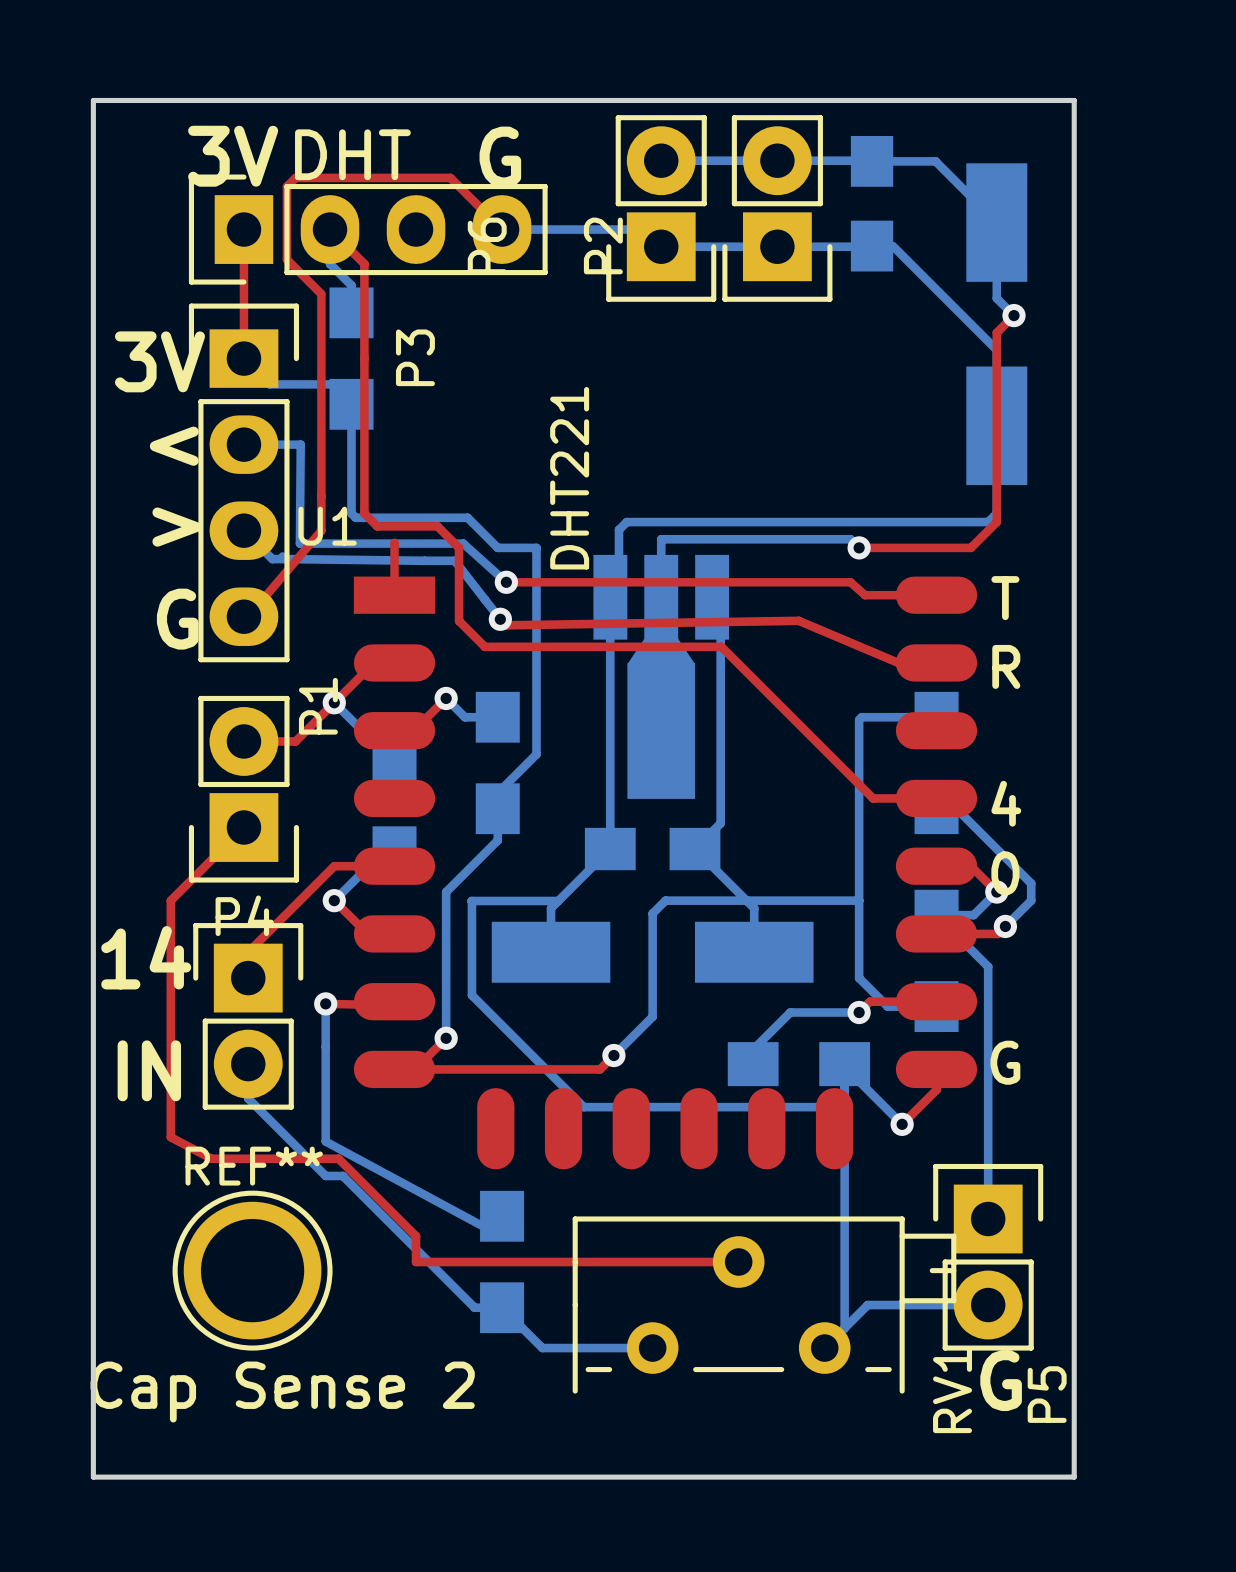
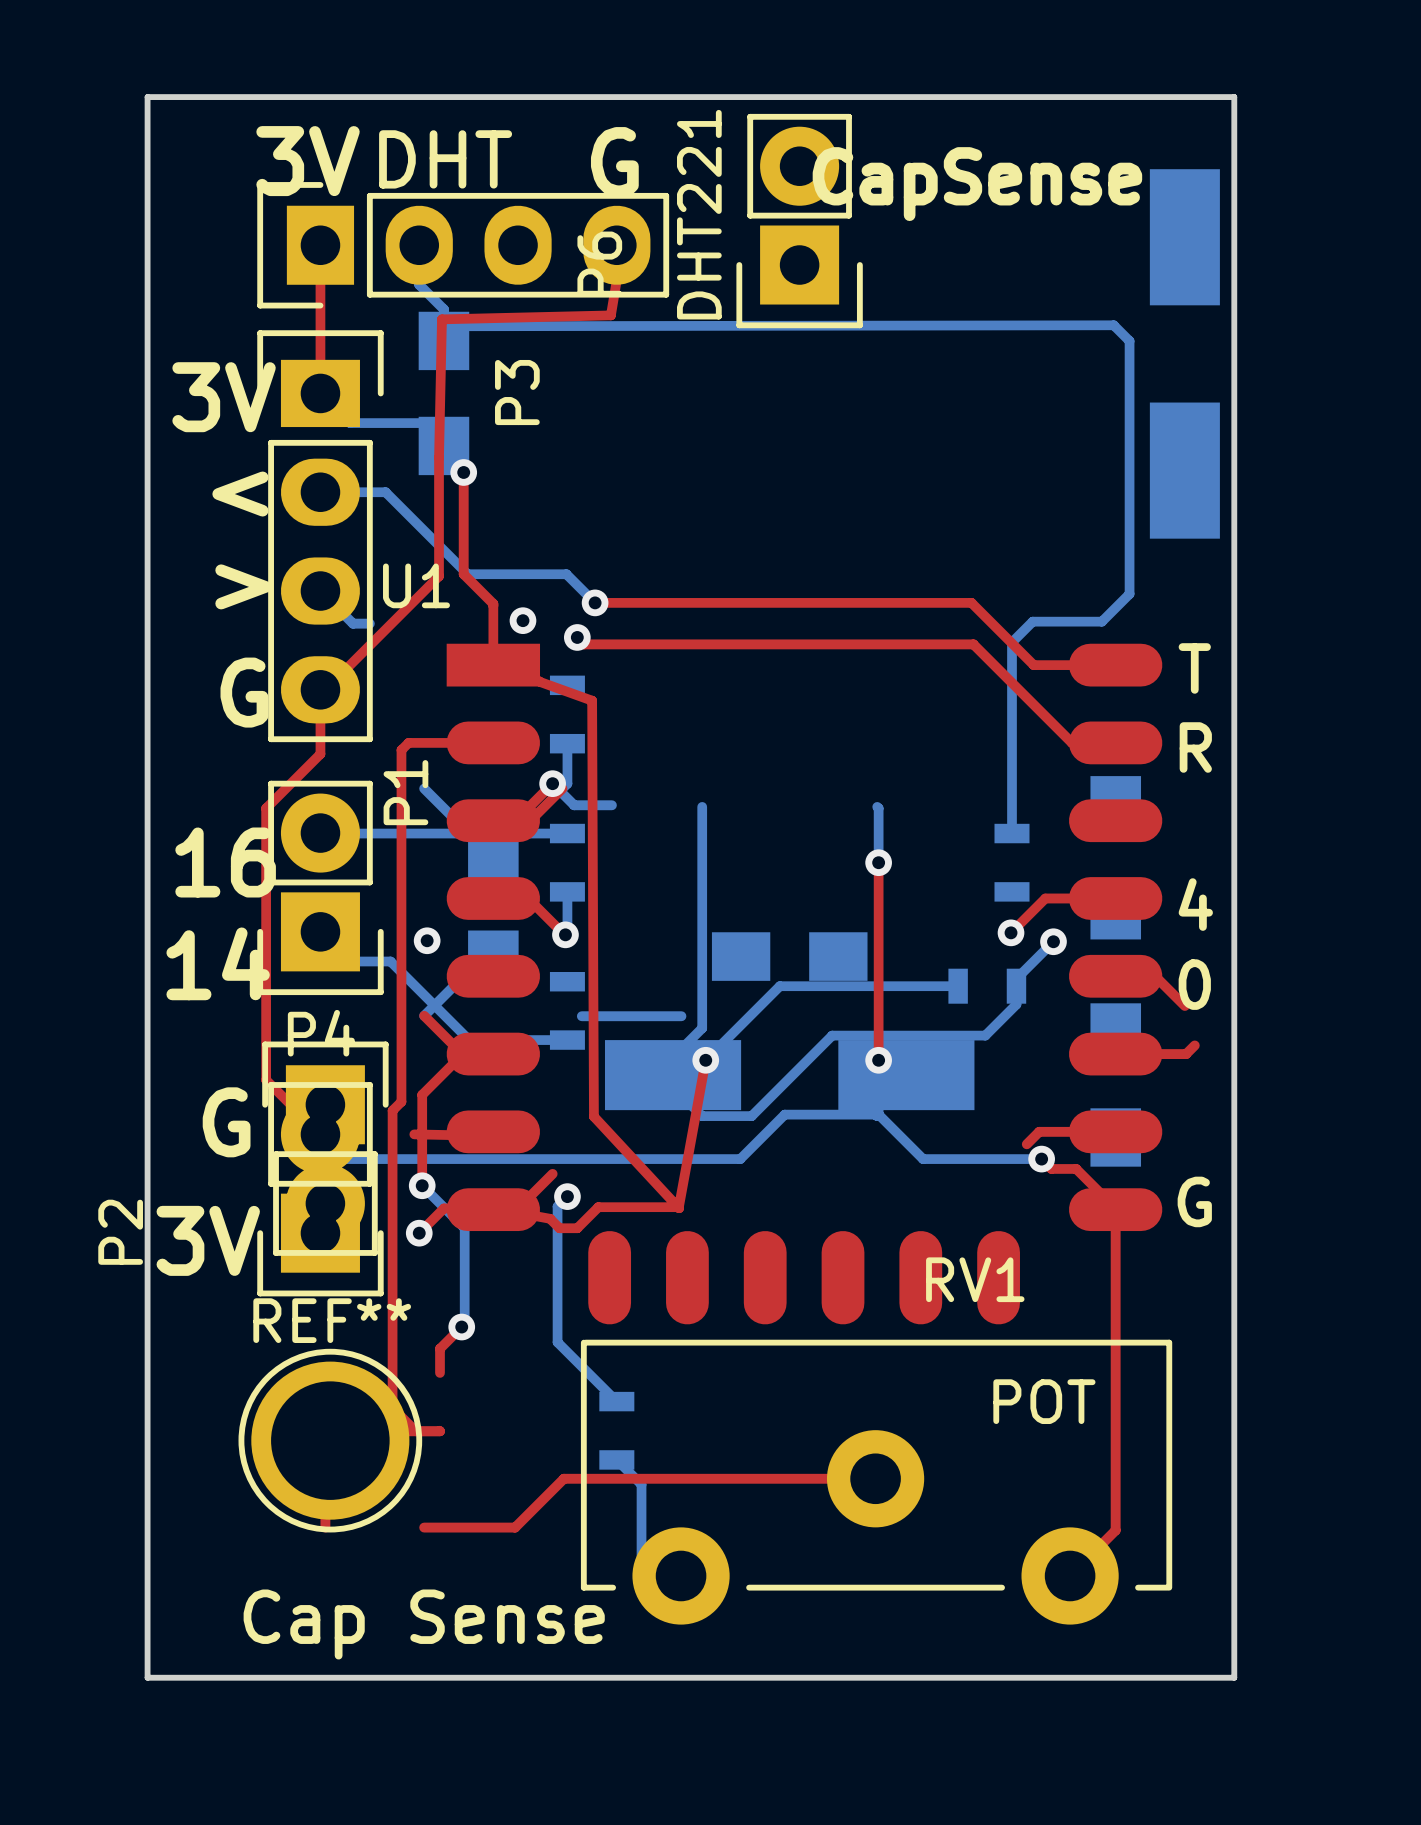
board edge: (1039, 100) (1074, 100) (1074, 1477) (1039, 1477) -> (1234, 97) (1234, 1677)
bottom track: (661, 160) (935, 161) (996, 222) (996, 298) (1014, 315) -> none
text: none -> CapSense (977, 184)
part: (872, 203) -> none
P2 position: (777, 208) -> (320, 1189)
top track: (329, 229) (364, 263) (364, 513) (377, 526) (437, 526) (459, 547) (459, 621) (484, 646) (721, 646) (873, 798) (875, 798) -> (1011, 932) (1045, 898)
bottom track: (502, 229) (644, 229) (661, 246) (872, 246) -> none
top track: (502, 229) (450, 177) (295, 177) (286, 186) (286, 259) (321, 294) (321, 530) (248, 616) -> (616, 245) (616, 279) (610, 315) (441, 319) (439, 576) (325, 689)
bottom track: (892, 246) (996, 349) (996, 513) (988, 522) (626, 522) (619, 529) (619, 580) (610, 588) (610, 849) (551, 908) (551, 952) -> none
bottom track: none -> (442, 326) (1113, 325) (1129, 341) (1129, 593) (1101, 621) (1032, 621) (1012, 642) (1012, 833)
top track: (1014, 315) (996, 332) (996, 522) (970, 547) (859, 547) -> none
via: (1014, 315) -> none
bottom track: (351, 404) (351, 513) (355, 517) (467, 517) (497, 547) (536, 547) (536, 754) (497, 793) (497, 840) (446, 892) (446, 1038) -> none
top track: none -> (463, 472) (463, 574) (493, 605)
via: none -> (463, 472)
bottom track: (300, 444) (299, 543) (463, 543) (506, 582) -> (385, 492) (467, 574) (566, 574) (595, 602)
DHT221 name position: DHT221 (569, 478) -> DHT221 (699, 214)
via: none -> (595, 602)
bottom track: (859, 547) (850, 539) (661, 539) (661, 597) -> none
via: (859, 547) -> none
bottom track: (282, 556) (285, 559) (454, 560) (500, 619) -> none
via: none -> (522, 620)
via: none -> (577, 637)
bottom track: (720, 580) (720, 823) (694, 849) (754, 908) (754, 952) -> none
top track: (506, 582) (850, 582) (865, 595) -> (595, 602) (971, 602) (1033, 665)
via: (506, 582) -> none
top track: none -> (513, 665) (540, 682) (592, 700) (593, 1116) (678, 1207)
top track: none -> (320, 689) (320, 754) (266, 808) (266, 1080) (320, 1134)
top track: (500, 619) (506, 625) (798, 620) (898, 662) -> (577, 637) (584, 644) (973, 644) (1072, 742)
via: (500, 619) -> none
part: none -> (567, 714)
top track: (374, 662) (295, 741) (243, 741) -> (469, 742) (408, 742) (401, 750) (401, 1101) (392, 1110) (392, 1408) (415, 1431) (440, 1431) (334, 1431) (325, 1440) (325, 1527)
bottom track: none -> (567, 743) (567, 783) (562, 788)
part: (661, 676) -> none
via: (334, 702) -> none
top track: none -> (562, 788) (530, 820)
bottom track: (936, 717) (861, 717) (859, 719) (859, 978) (887, 1006) (936, 1006) -> none
bottom track: none -> (702, 806) (702, 1028) (661, 1069) (661, 1075) (702, 1116) (751, 1116) (832, 1035) (985, 1035) (1016, 1004) (1016, 978) (1053, 941)
bottom track: none -> (877, 806) (878, 862)
bottom track: none -> (567, 833) (349, 833) (320, 862)
part: (497, 762) -> none
text: none -> 16 (225, 862)
part: none -> (567, 862)
top track: none -> (878, 862) (878, 1060)
via: none -> (878, 862)
part: none -> (1012, 862)
bottom track: none -> (567, 891) (567, 932) (565, 934)
top track: none -> (528, 898) (565, 934)
bottom track: (936, 808) (956, 808) (1031, 883) (1031, 900) (1005, 926) -> none
top track: (243, 827) (170, 900) (170, 1137) (211, 1158) (338, 1158) (416, 1236) (416, 1262) (738, 1262) -> none
via: none -> (1011, 932)
via: none -> (565, 934)
via: none -> (1053, 941)
bottom track: none -> (320, 961) (390, 961) (469, 1040) (567, 1040)
top track: (394, 866) (334, 866) (248, 952) (248, 978) -> none
bottom track: none -> (958, 986) (779, 986) (705, 1060)
part: none -> (987, 986)
bottom track: (996, 892) (973, 915) (936, 915) (988, 966) (988, 1218) -> none
via: (996, 892) -> none
part: none -> (567, 1010)
via position: (334, 900) -> (427, 940)
bottom track: (859, 900) (665, 900) (652, 913) (652, 1016) (613, 1055) -> none
bottom track: (471, 901) (471, 995) (583, 1107) (841, 1107) (844, 1104) -> none
via: (1005, 926) -> none
top track: none -> (463, 1054) (422, 1094) (422, 1185)
top track: none -> (705, 1060) (678, 1207)
via: none -> (705, 1060)
via: none -> (878, 1060)
text position: 14 (146, 957) -> 14 (218, 963)
bottom track: none -> (878, 1114) (784, 1114) (740, 1159) (345, 1159) (320, 1134)
bottom track: none -> (878, 1114) (923, 1159) (1041, 1159)
text: none -> G (226, 1122)
bottom track: (325, 1003) (325, 1141) (502, 1236) -> (567, 1196) (557, 1206) (557, 1342) (616, 1401)
via: (325, 1003) -> none
bottom track: (859, 1012) (790, 1012) (753, 1049) (753, 1064) -> none
via position: (859, 1012) -> (1041, 1159)
top track: none -> (1041, 1159) (1051, 1168) (1076, 1168) (1115, 1208)
via position: (446, 1038) -> (567, 1196)
bottom track: none -> (422, 1185) (464, 1228) (464, 1324) (461, 1327)
via: none -> (422, 1185)
top track: (613, 1055) (600, 1069) (394, 1069) -> none
via: (613, 1055) -> none
bottom track: (248, 1064) (248, 1098) (325, 1175) (342, 1175) (474, 1307) (502, 1307) (542, 1348) (652, 1348) -> none
part: (798, 1064) -> none
bottom track: (844, 1064) (844, 1328) -> none
bottom track: (844, 1066) (902, 1124) -> none
top track: none -> (678, 1207) (598, 1207) (577, 1228) (559, 1228) (550, 1219) (493, 1208) (443, 1208) (419, 1233)
text: IN (149, 1070) -> 3V (208, 1240)
via: none -> (419, 1233)
top track: (936, 1090) (902, 1124) -> (1115, 1233) (1115, 1530) (1070, 1575)
via: (902, 1124) -> none
top track: none -> (461, 1327) (440, 1348) (440, 1372)
via: none -> (461, 1327)
part footprint: [480, 1190, 525, 1334] -> [599, 1391, 635, 1470]
RV1 footprint: [572, 1216, 957, 1394] -> [580, 1339, 1173, 1625]
RV1 value: none -> POT (1044, 1401)
P5: (988, 1257) -> none
bottom track: none -> (616, 1459) (641, 1484) (641, 1578)
top track: none -> (875, 1478) (563, 1478) (515, 1527) (424, 1527)
bottom track: (988, 1305) (867, 1305) (824, 1348) -> none
text: G (1001, 1380) -> none
RV1 name position: RV1 (952, 1390) -> RV1 (975, 1279)
text: Cap Sense 2 (282, 1392) -> Cap Sense (424, 1624)

